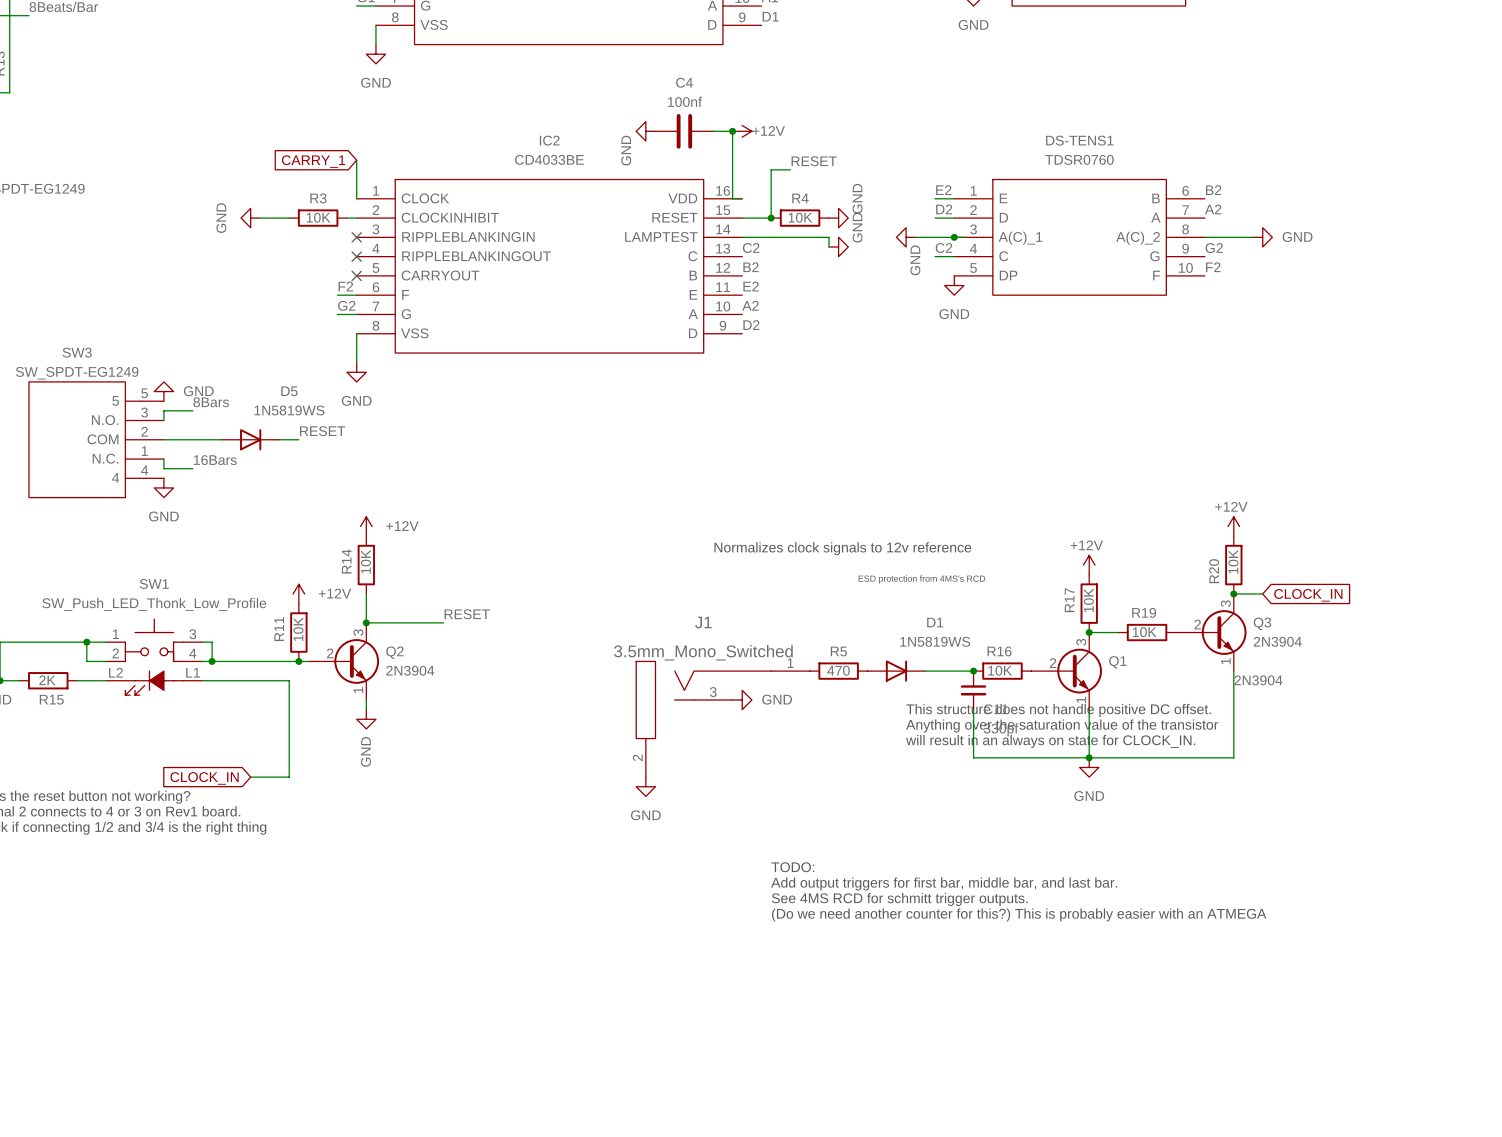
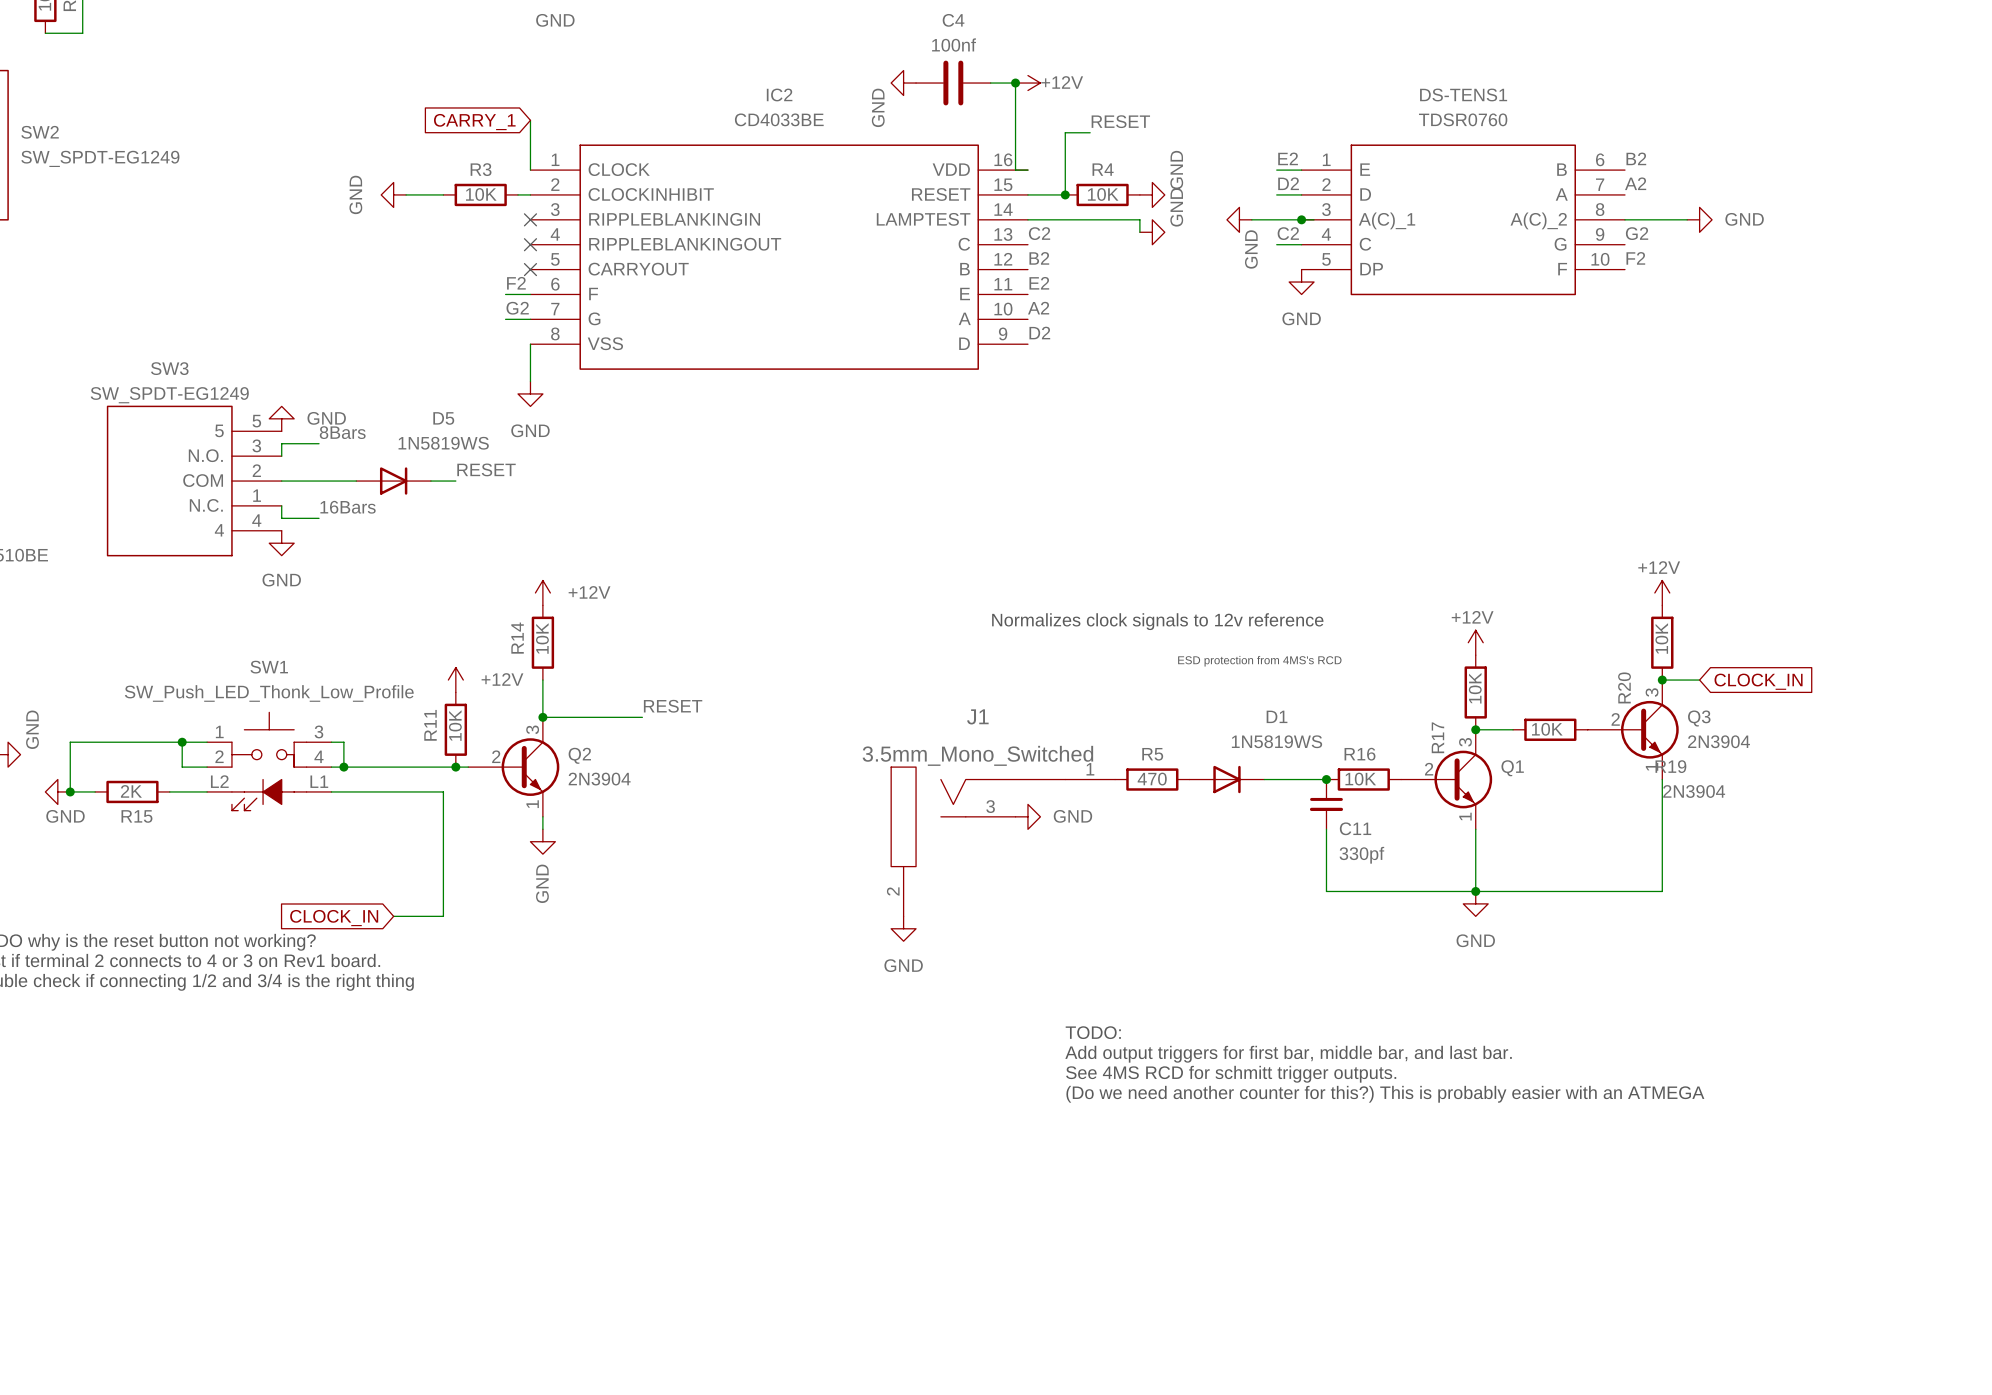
R20 name position: R20 (1214, 571) -> R20 (1624, 687)
R17 name position: R17 (1069, 600) -> R17 (1437, 737)
R19 name position: R19 (1144, 612) -> R19 (1670, 766)
text: This structure does not handle positive DC offset. (1058, 710) -> none
text: Anything over the saturation value of the transistor (1062, 725) -> none
text: will result in an always on state for CLOCK_IN. (1050, 741) -> none

